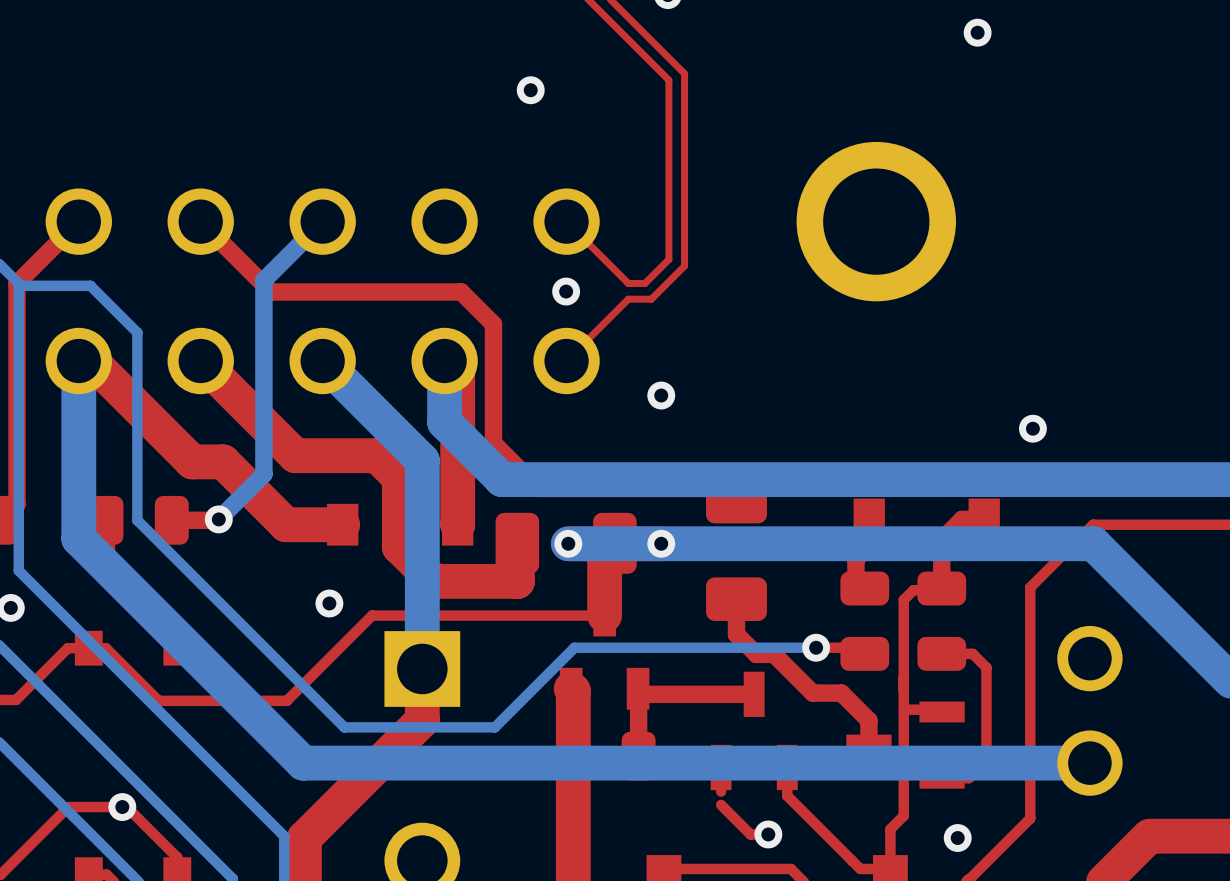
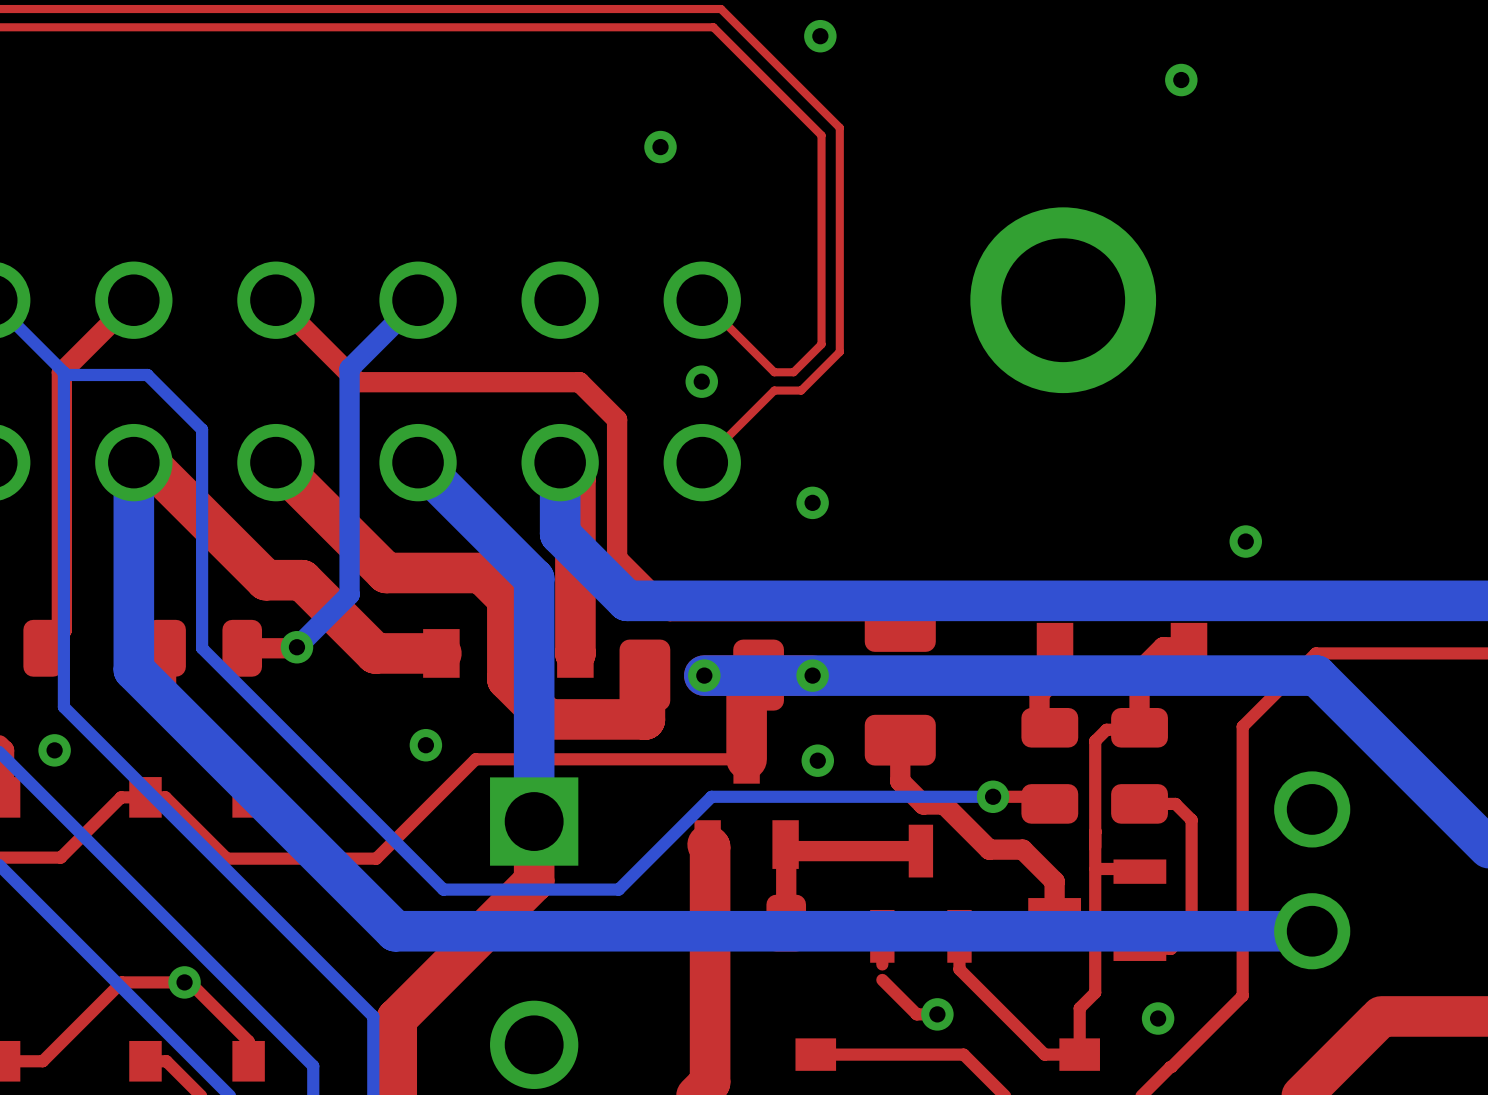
via: none -> (817, 760)

